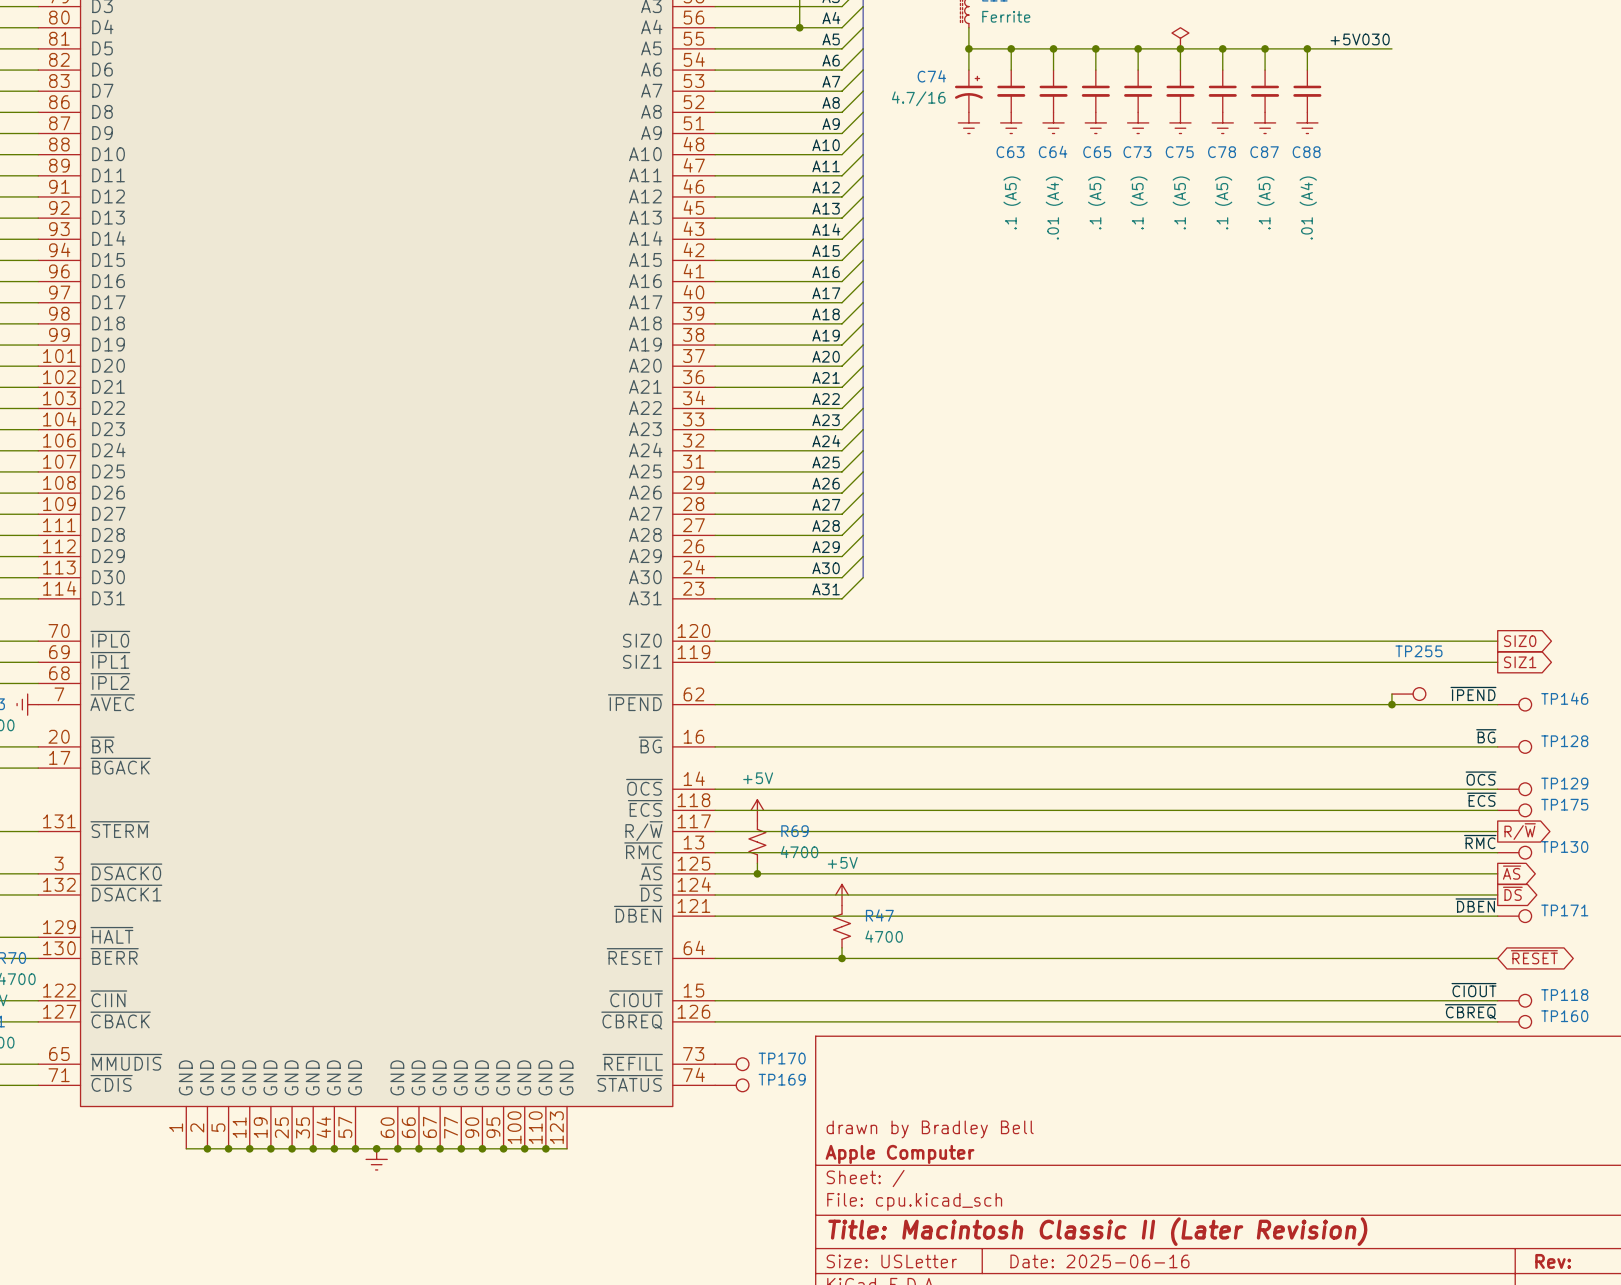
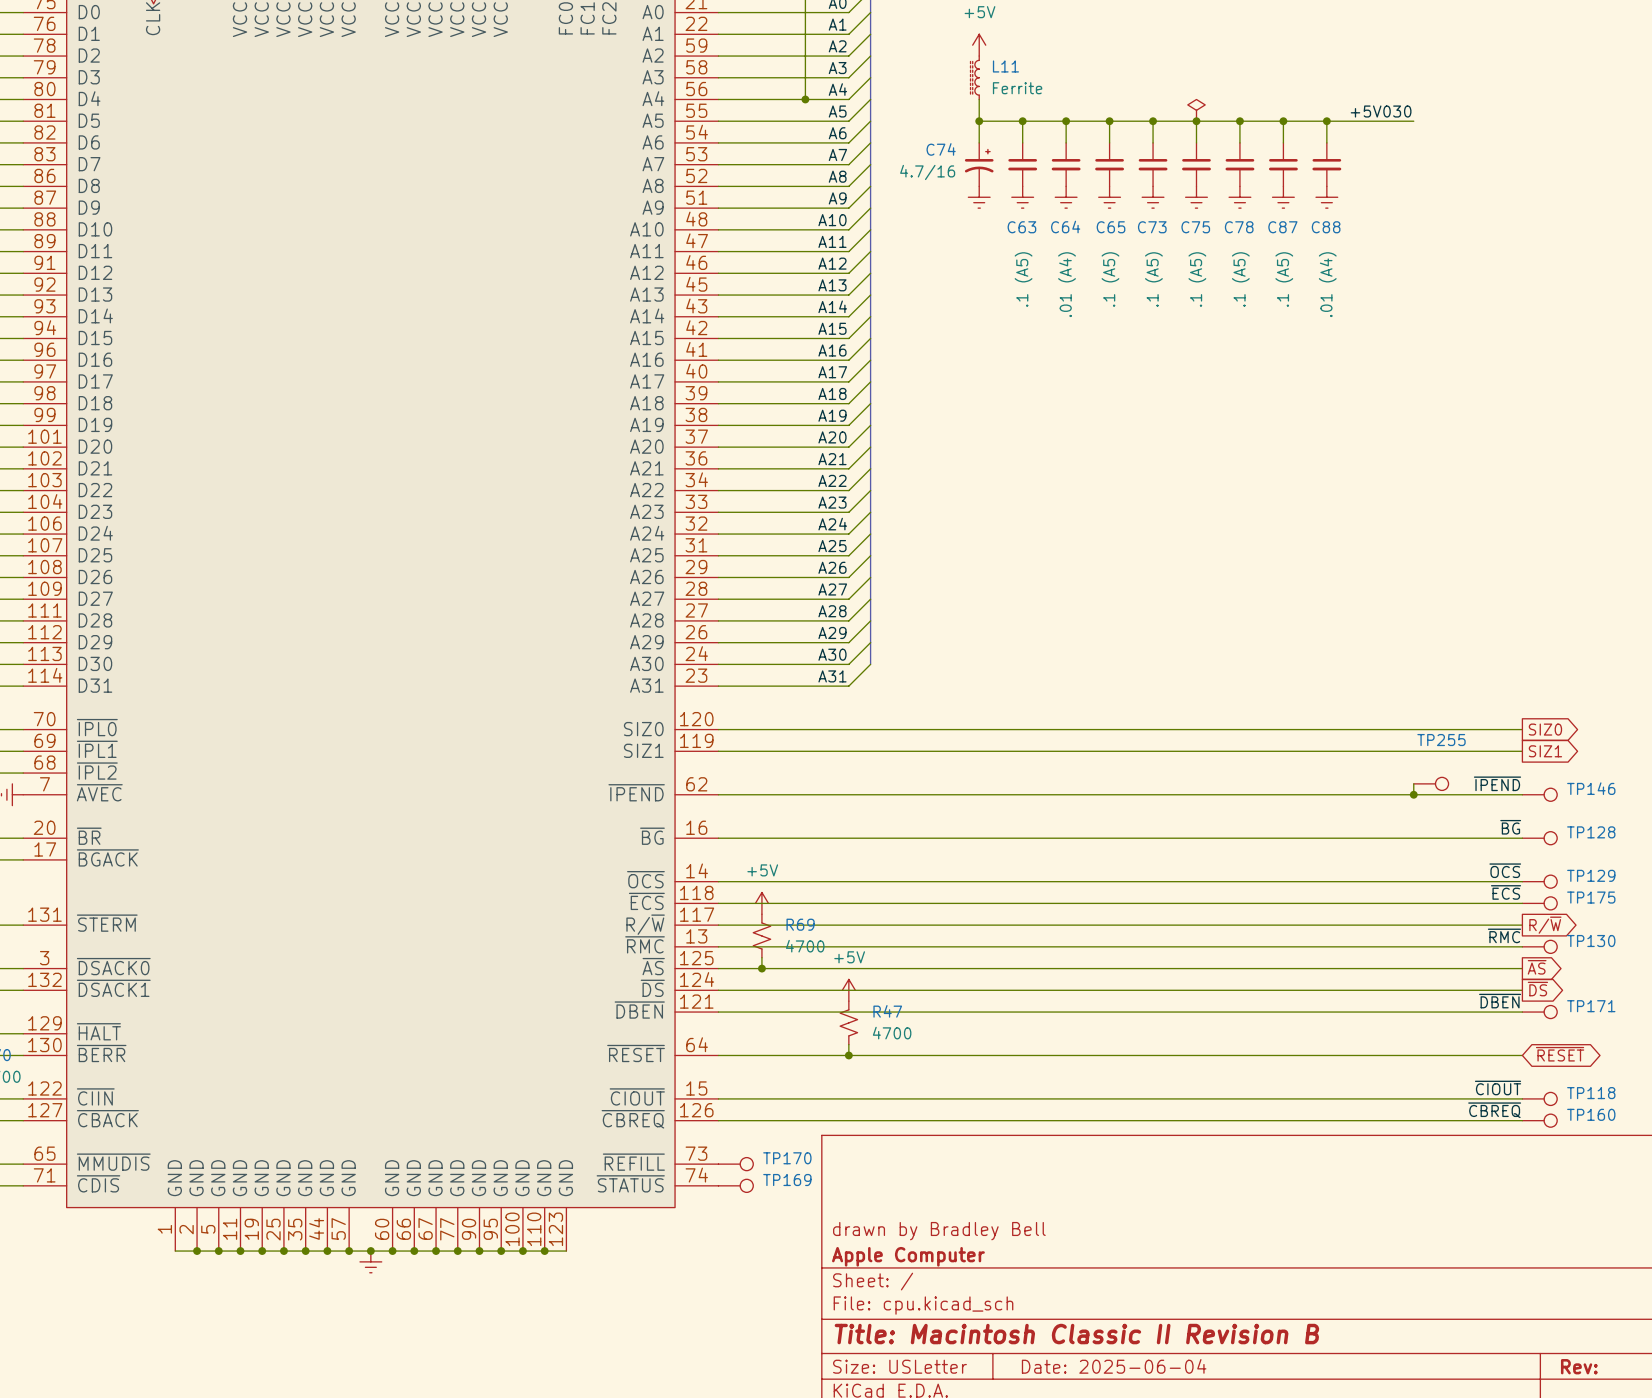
title block: Title: Macintosh Classic II (Later Revision) (1097, 1231) -> Title: Macintosh Classic II Revision B (1076, 1334)
title block: Date: 2025-06-16 (1099, 1261) -> Date: 2025-06-04 (1114, 1366)

